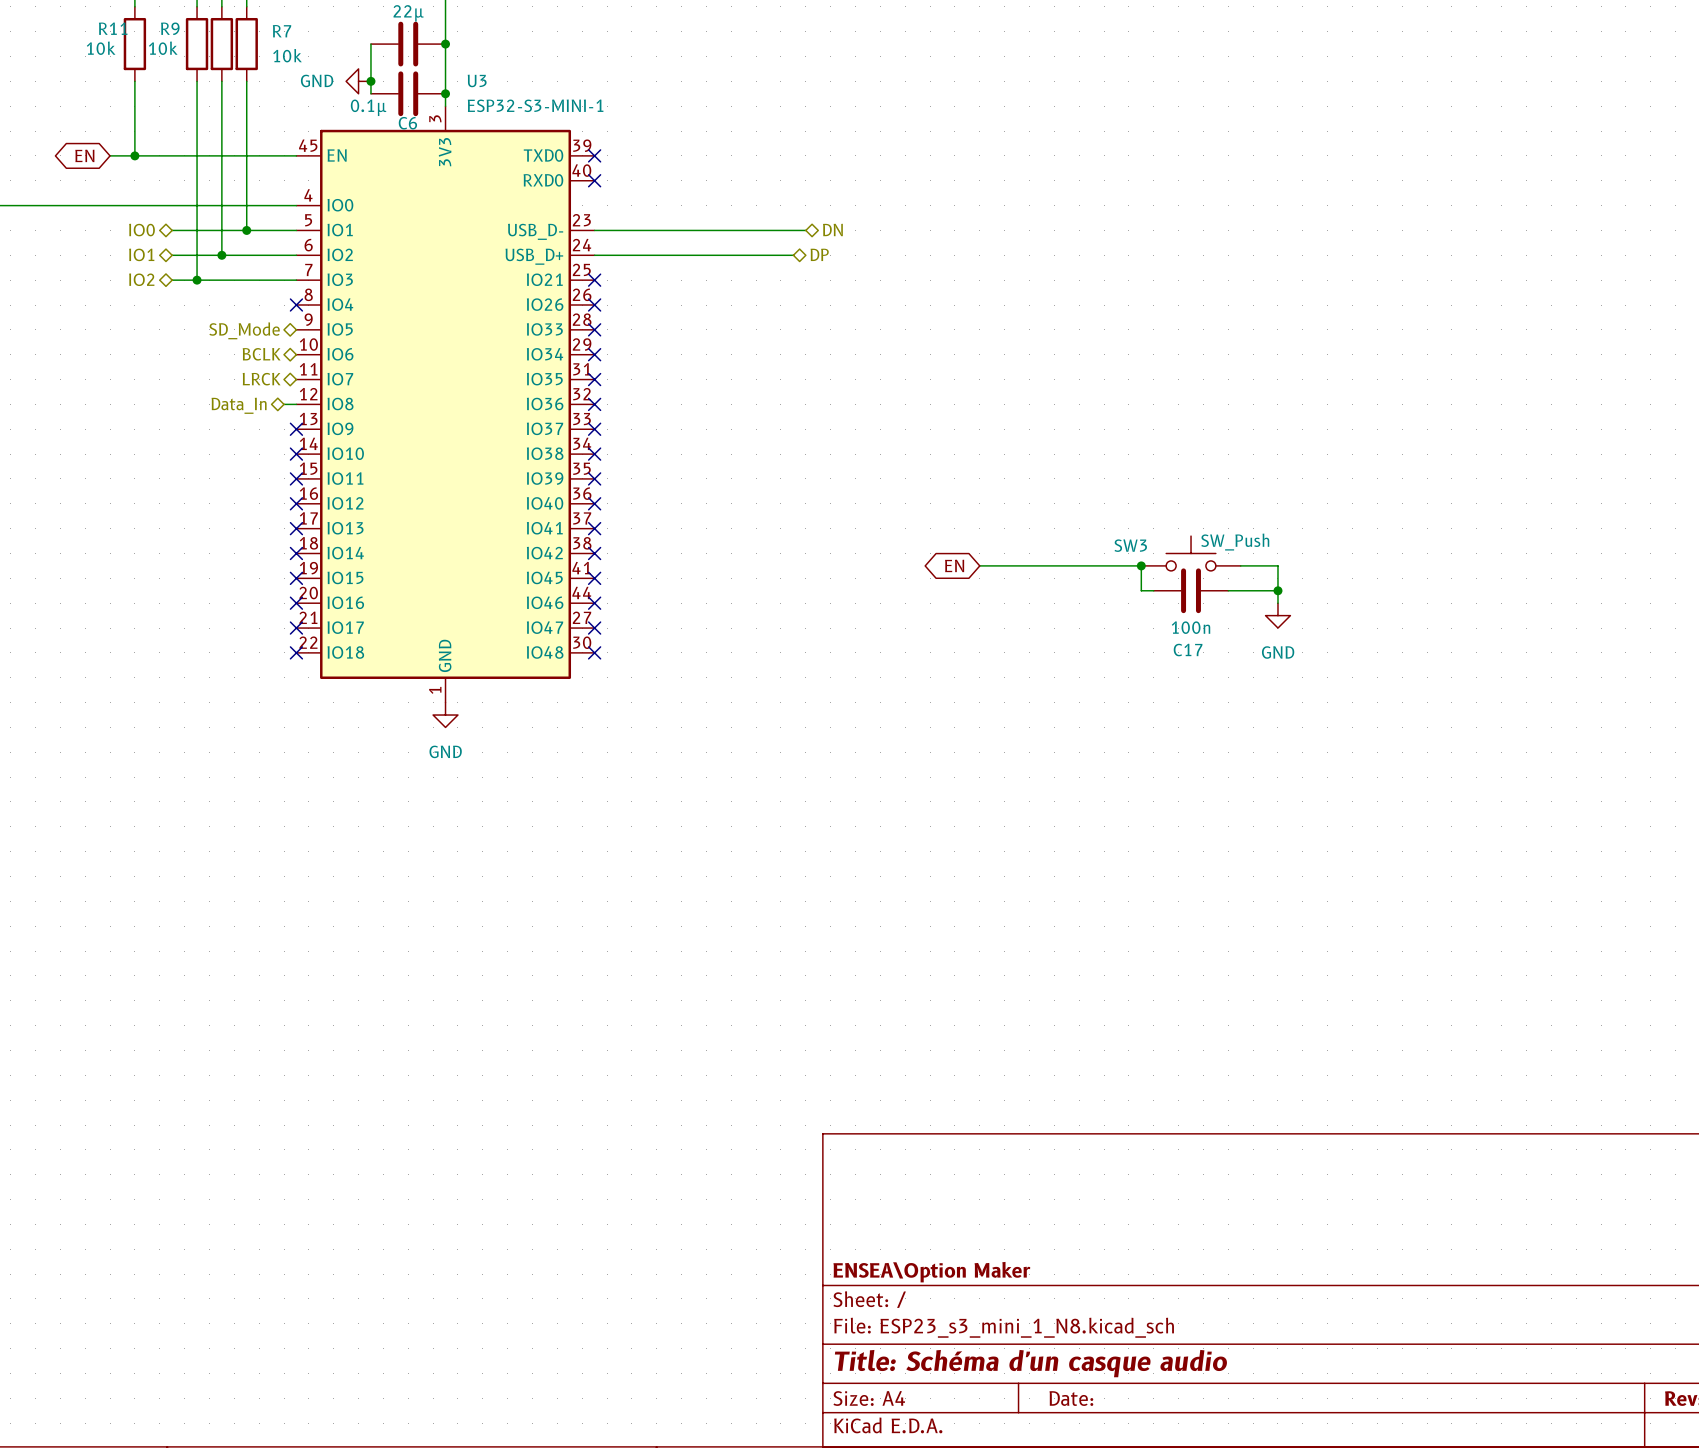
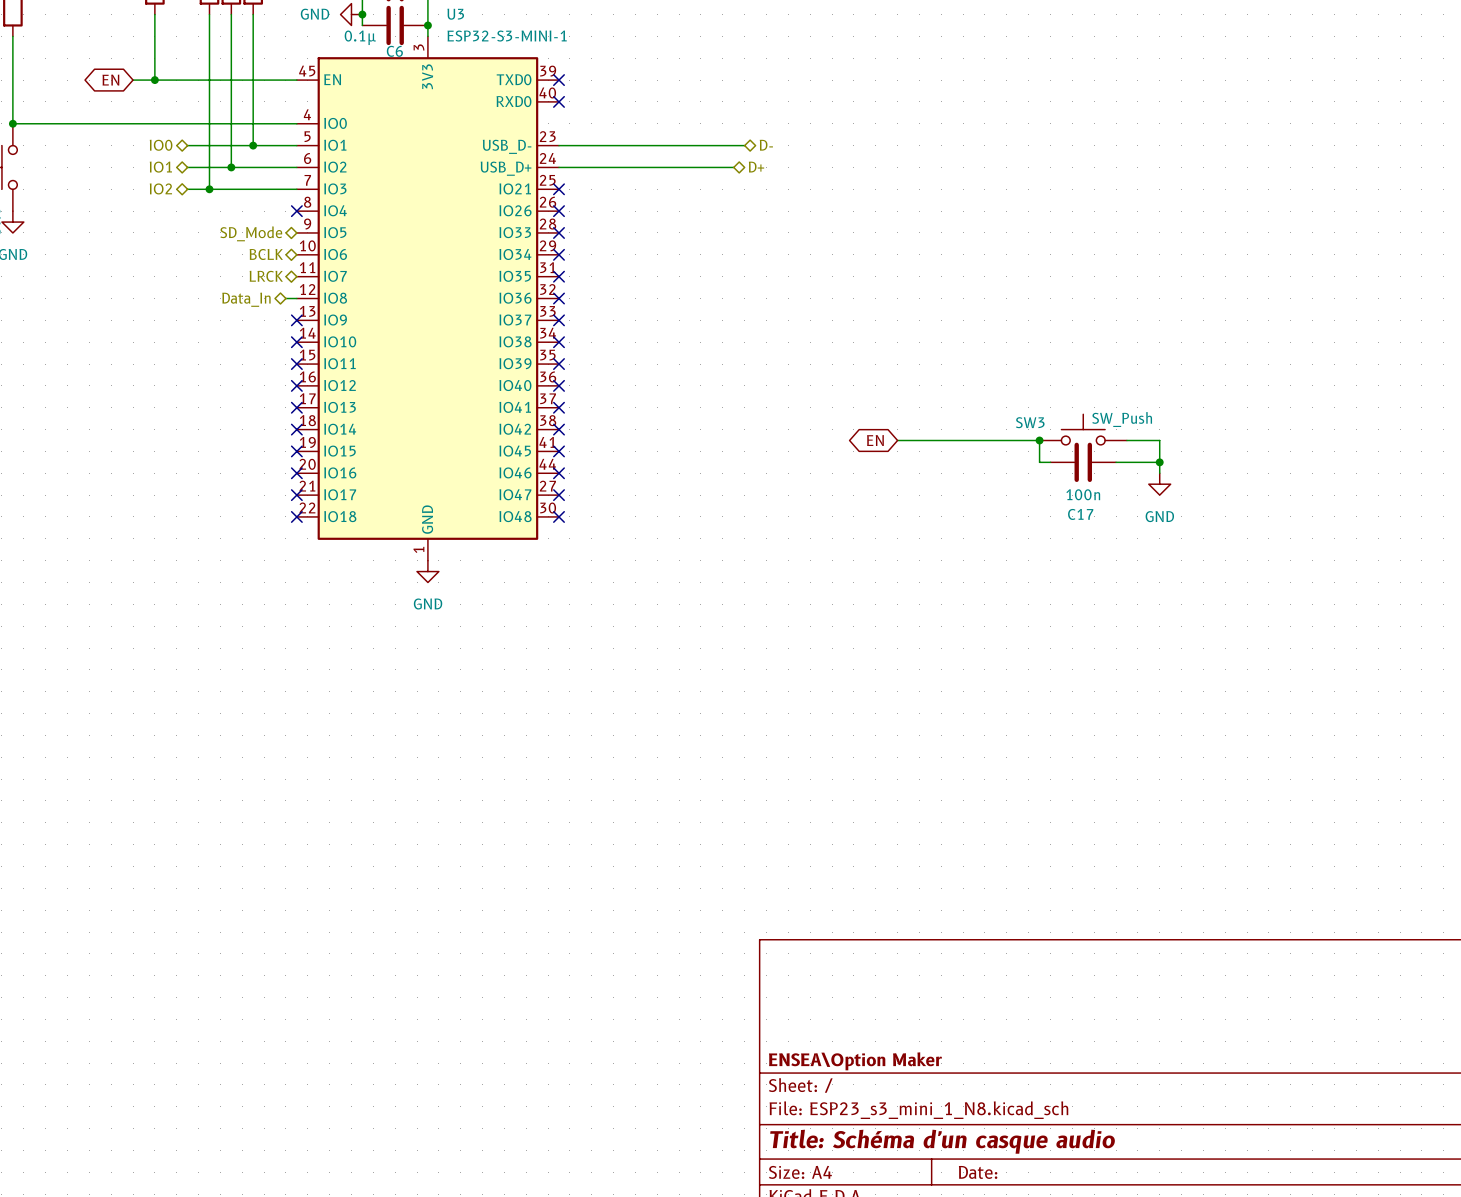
hierarchical label: DN (832, 229) -> D- (766, 145)
hierarchical label: DP (819, 254) -> D+ (756, 167)

